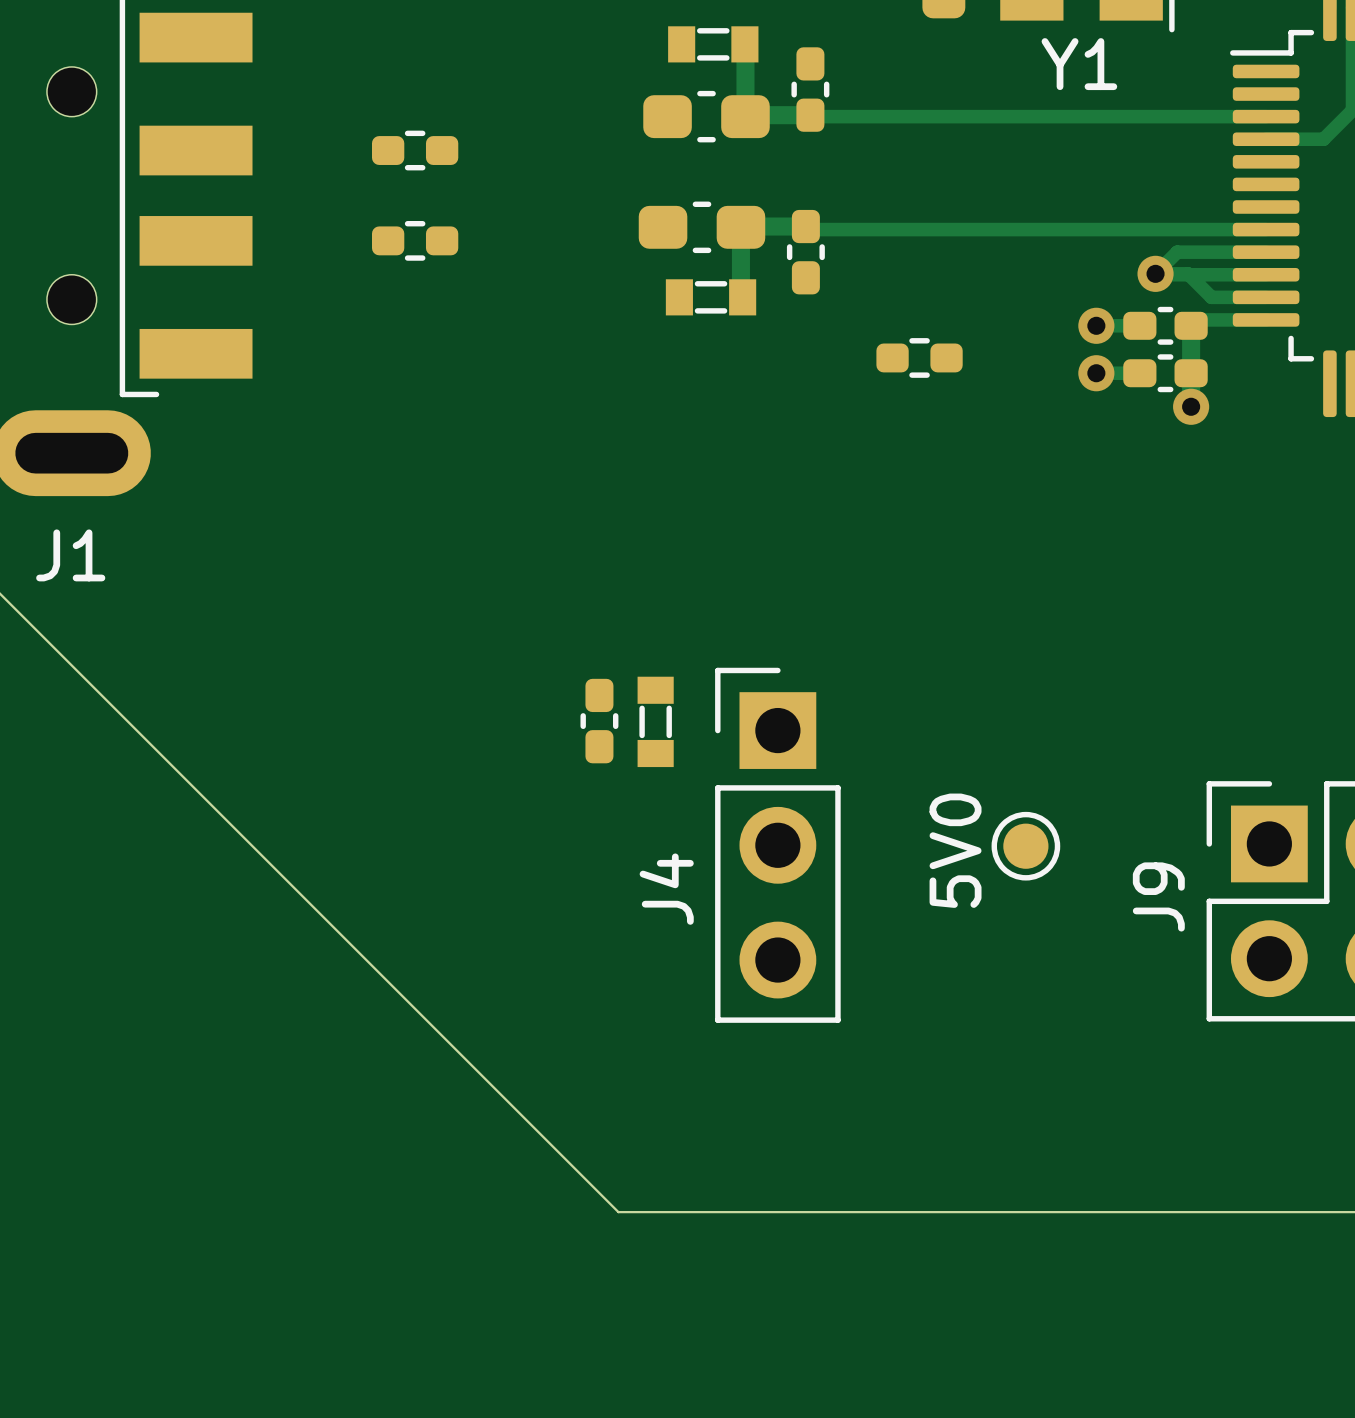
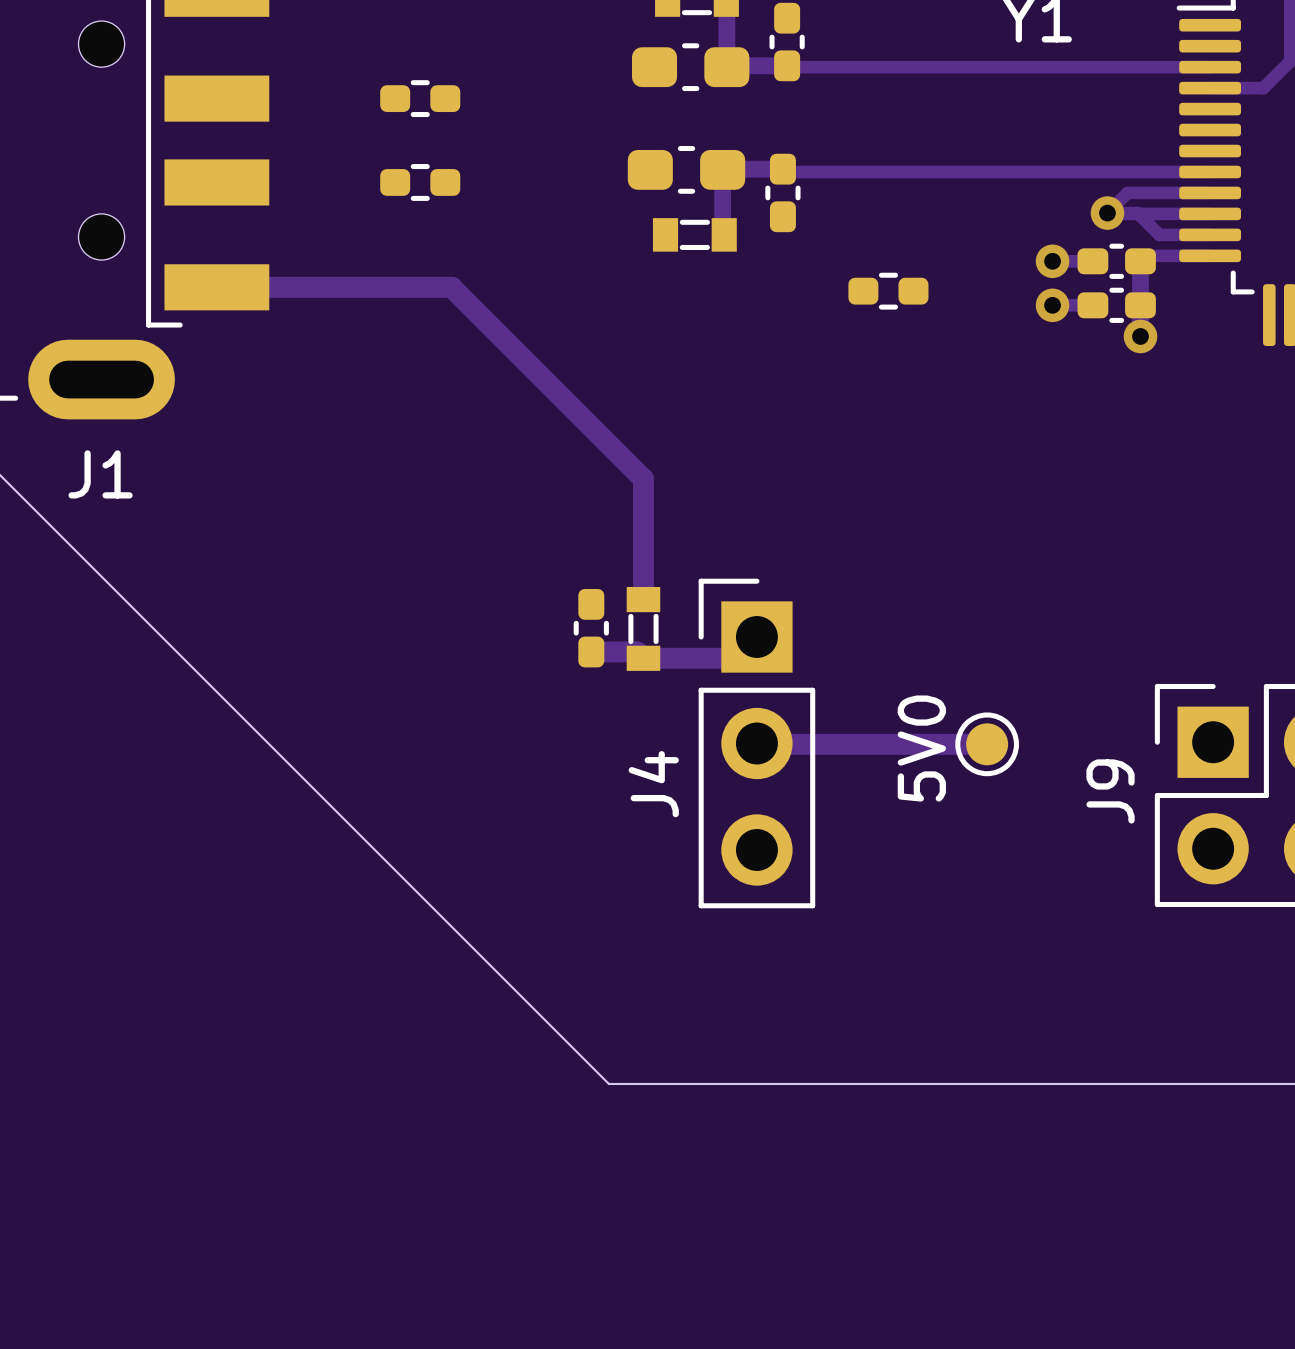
track: none -> (216, 287) (451, 287) (643, 479) (643, 599)
track: none -> (756, 636) (735, 658) (643, 658) (637, 651) (591, 651)
track: none -> (756, 743) (987, 744)

